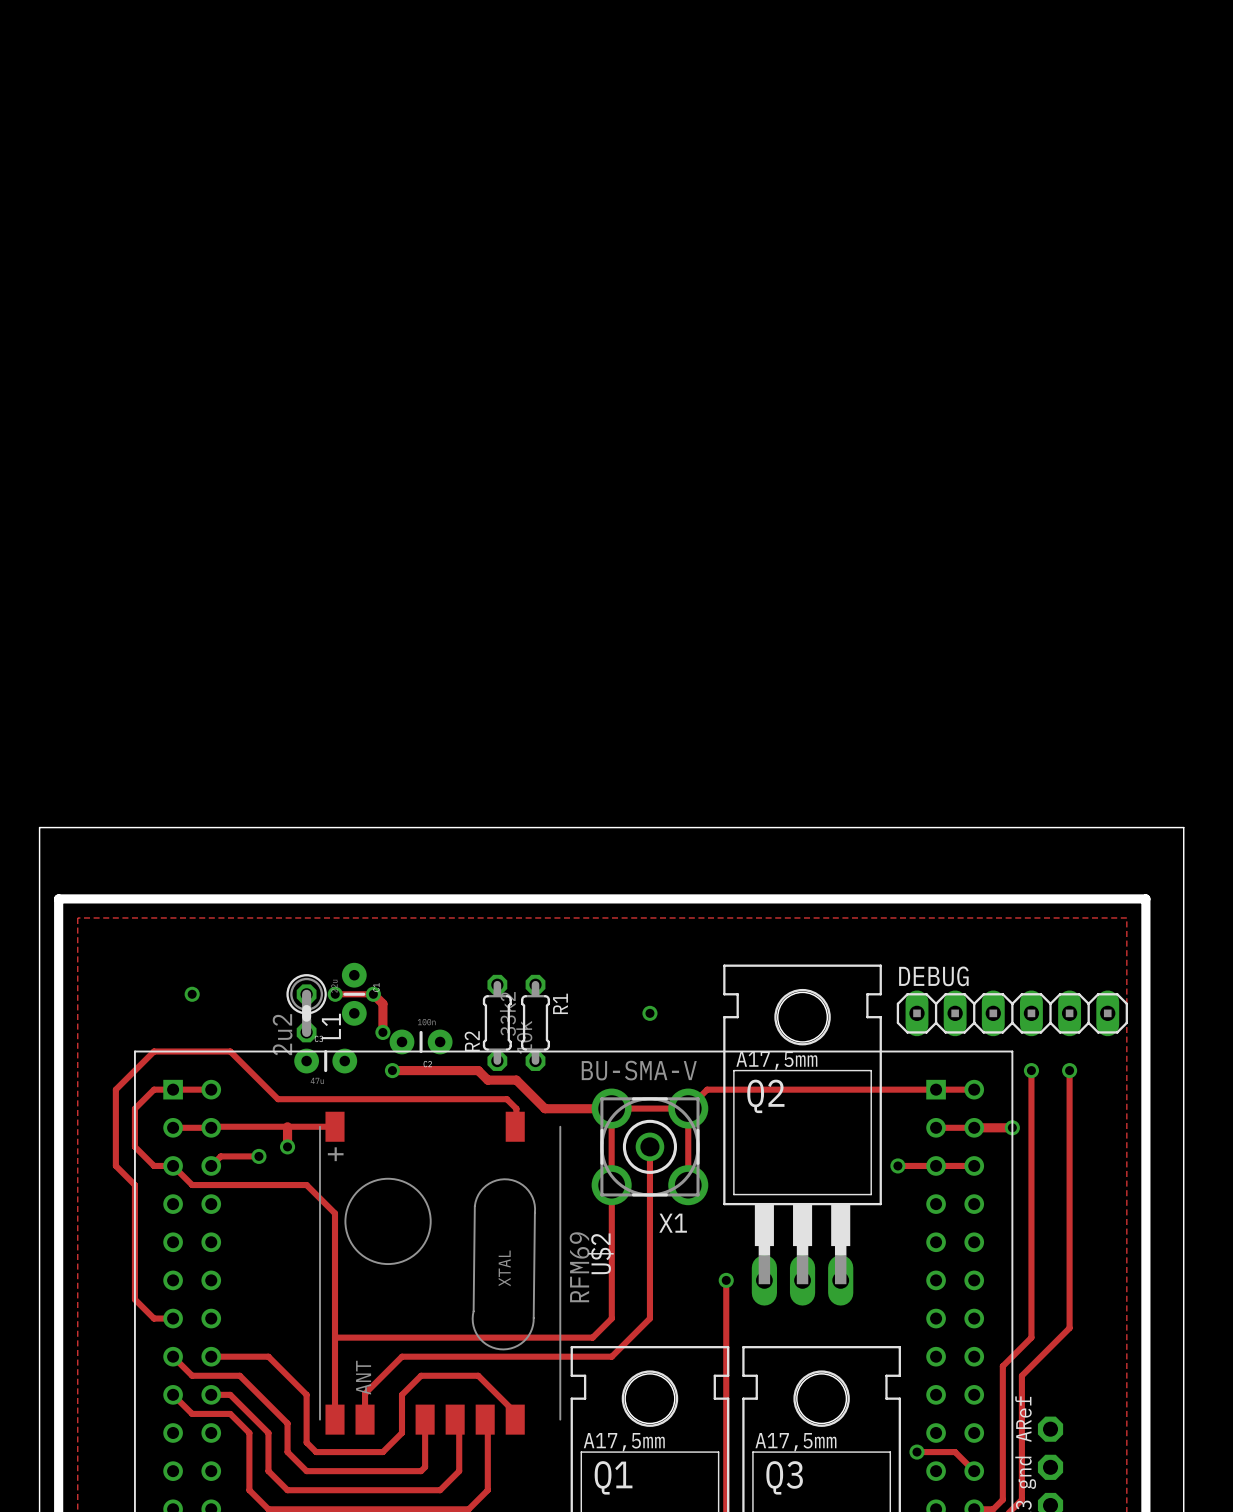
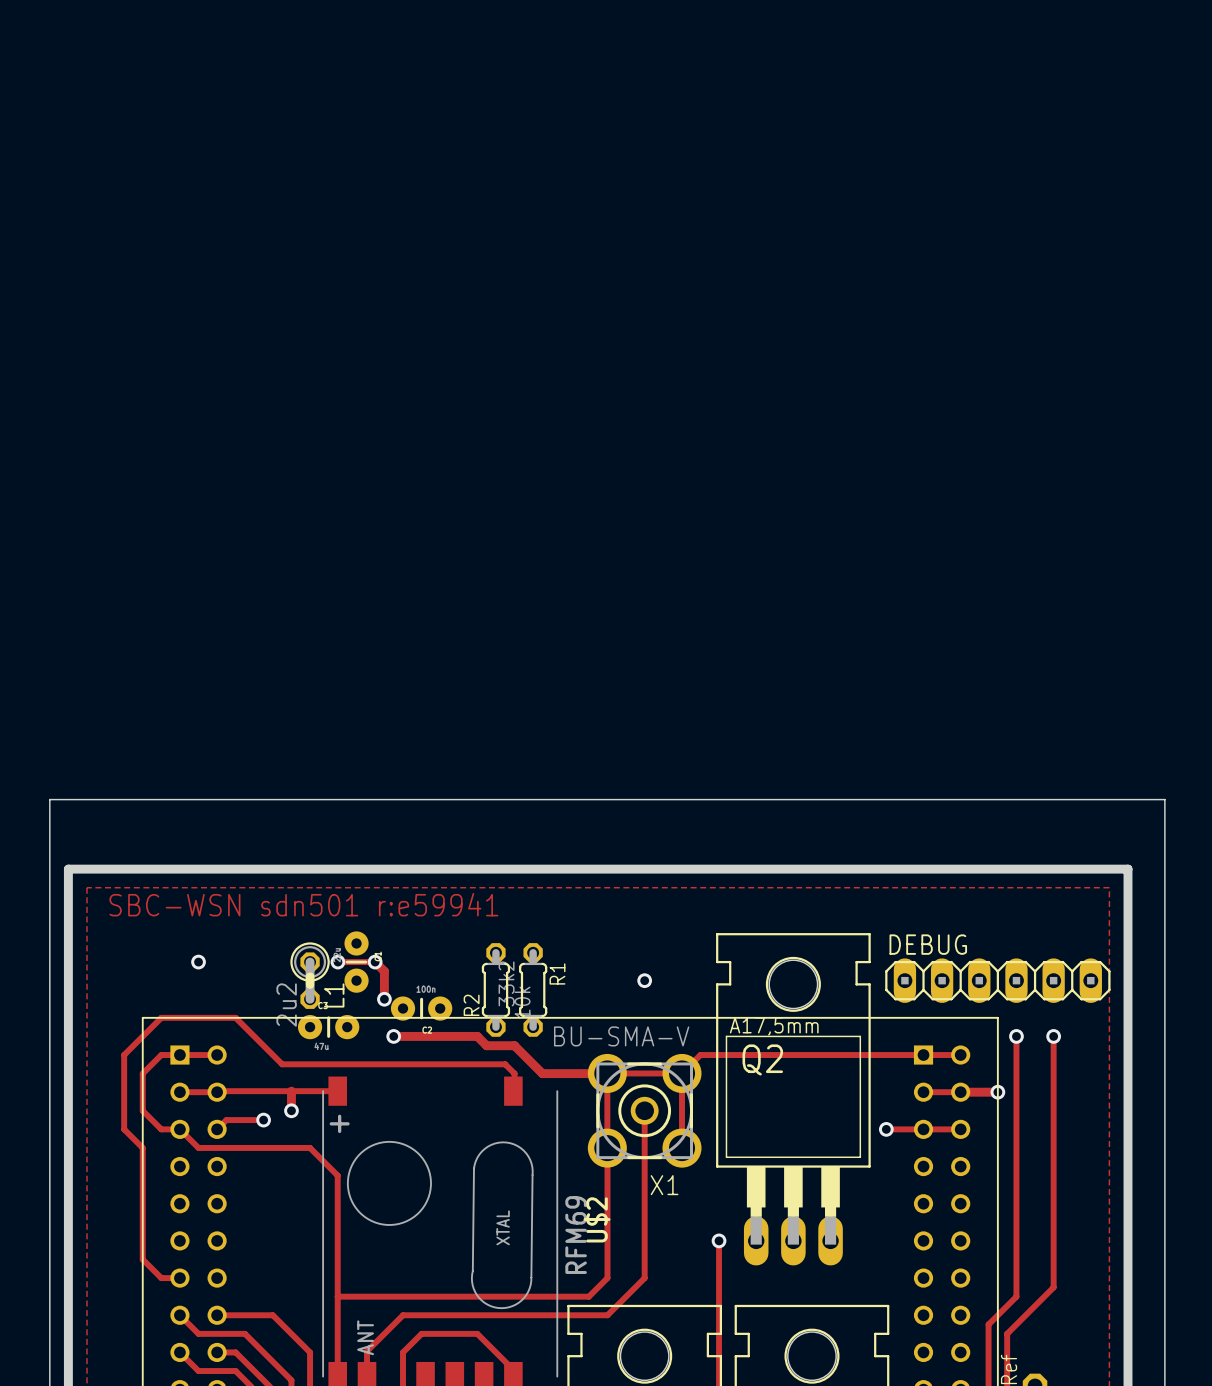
text: none -> SBC-WSN sdn501 r:e59941 (303, 904)

